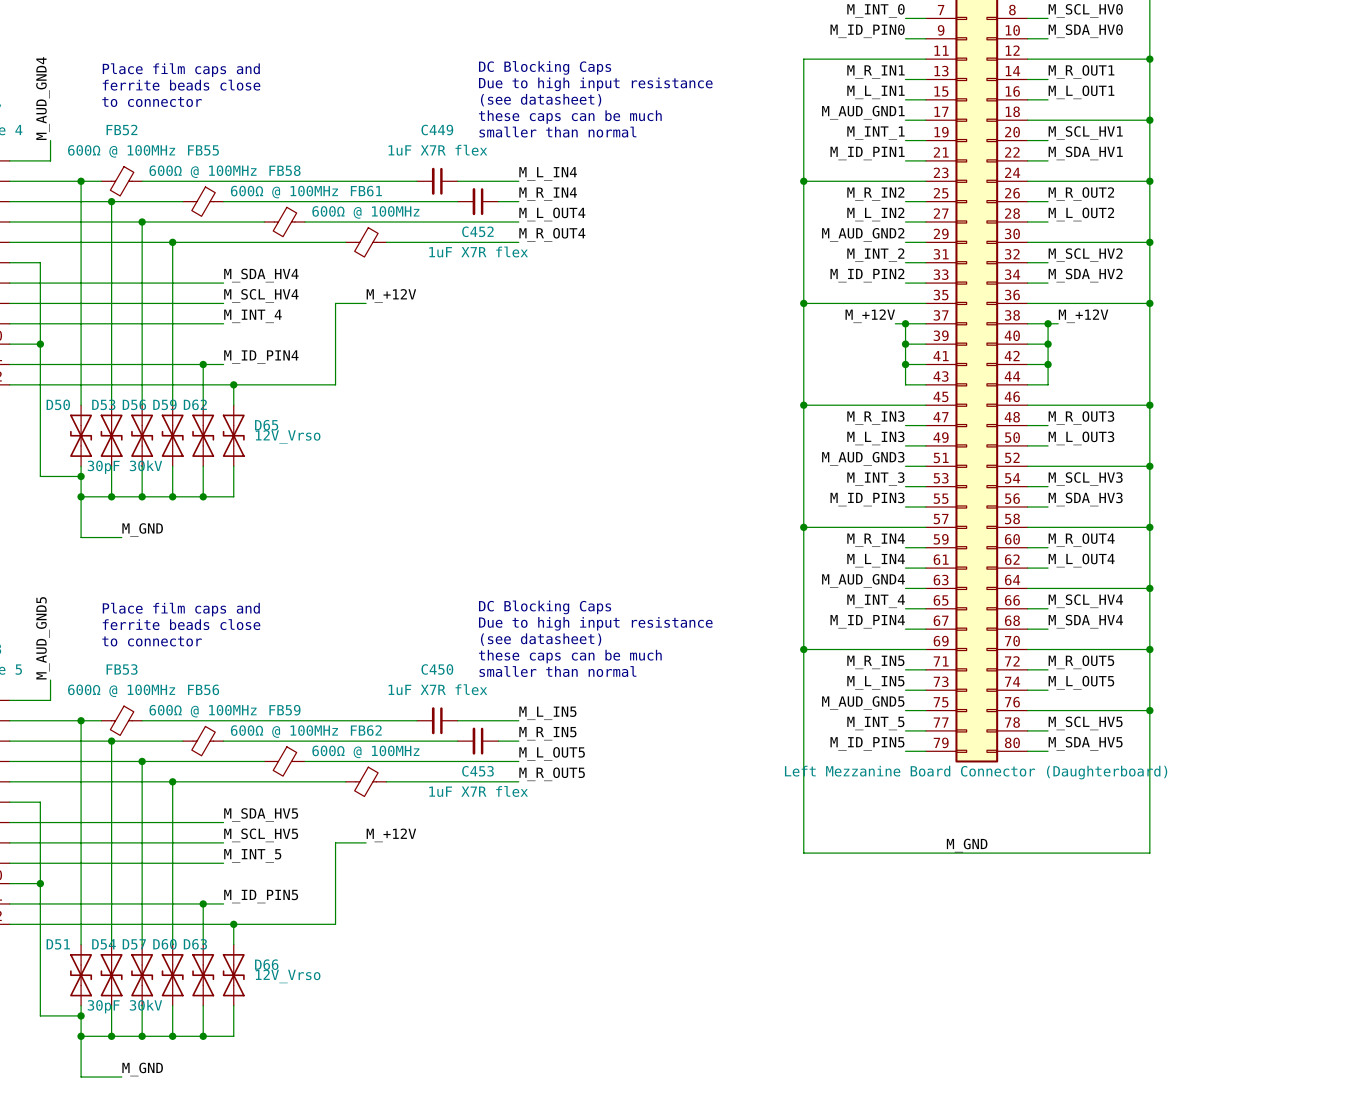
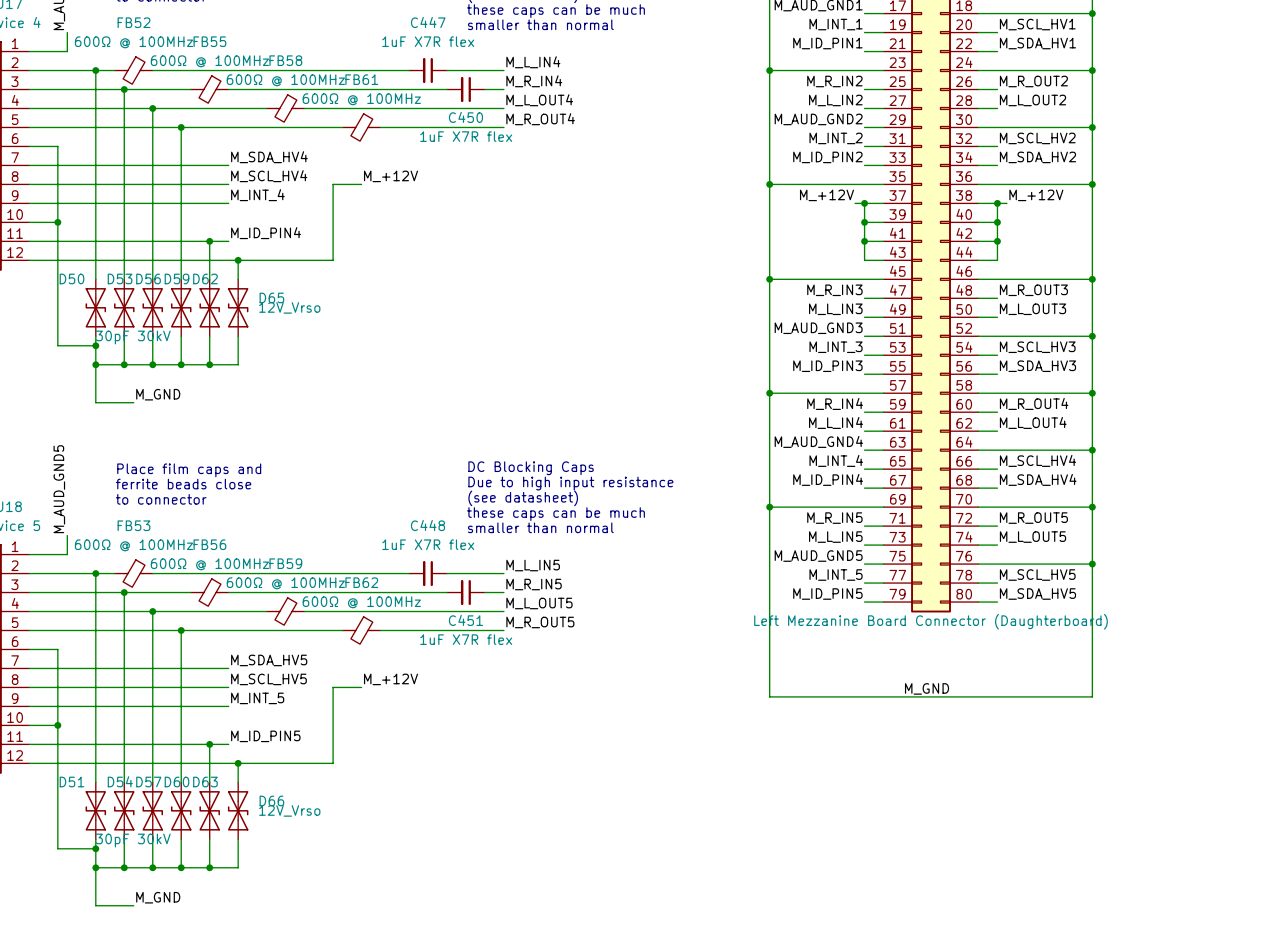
C449 name: C449 (437, 130) -> C447 (428, 22)
C452 name: C452 (477, 231) -> C450 (465, 117)
C450 name: C450 (437, 669) -> C448 (427, 525)
C453 name: C453 (477, 771) -> C451 (465, 620)

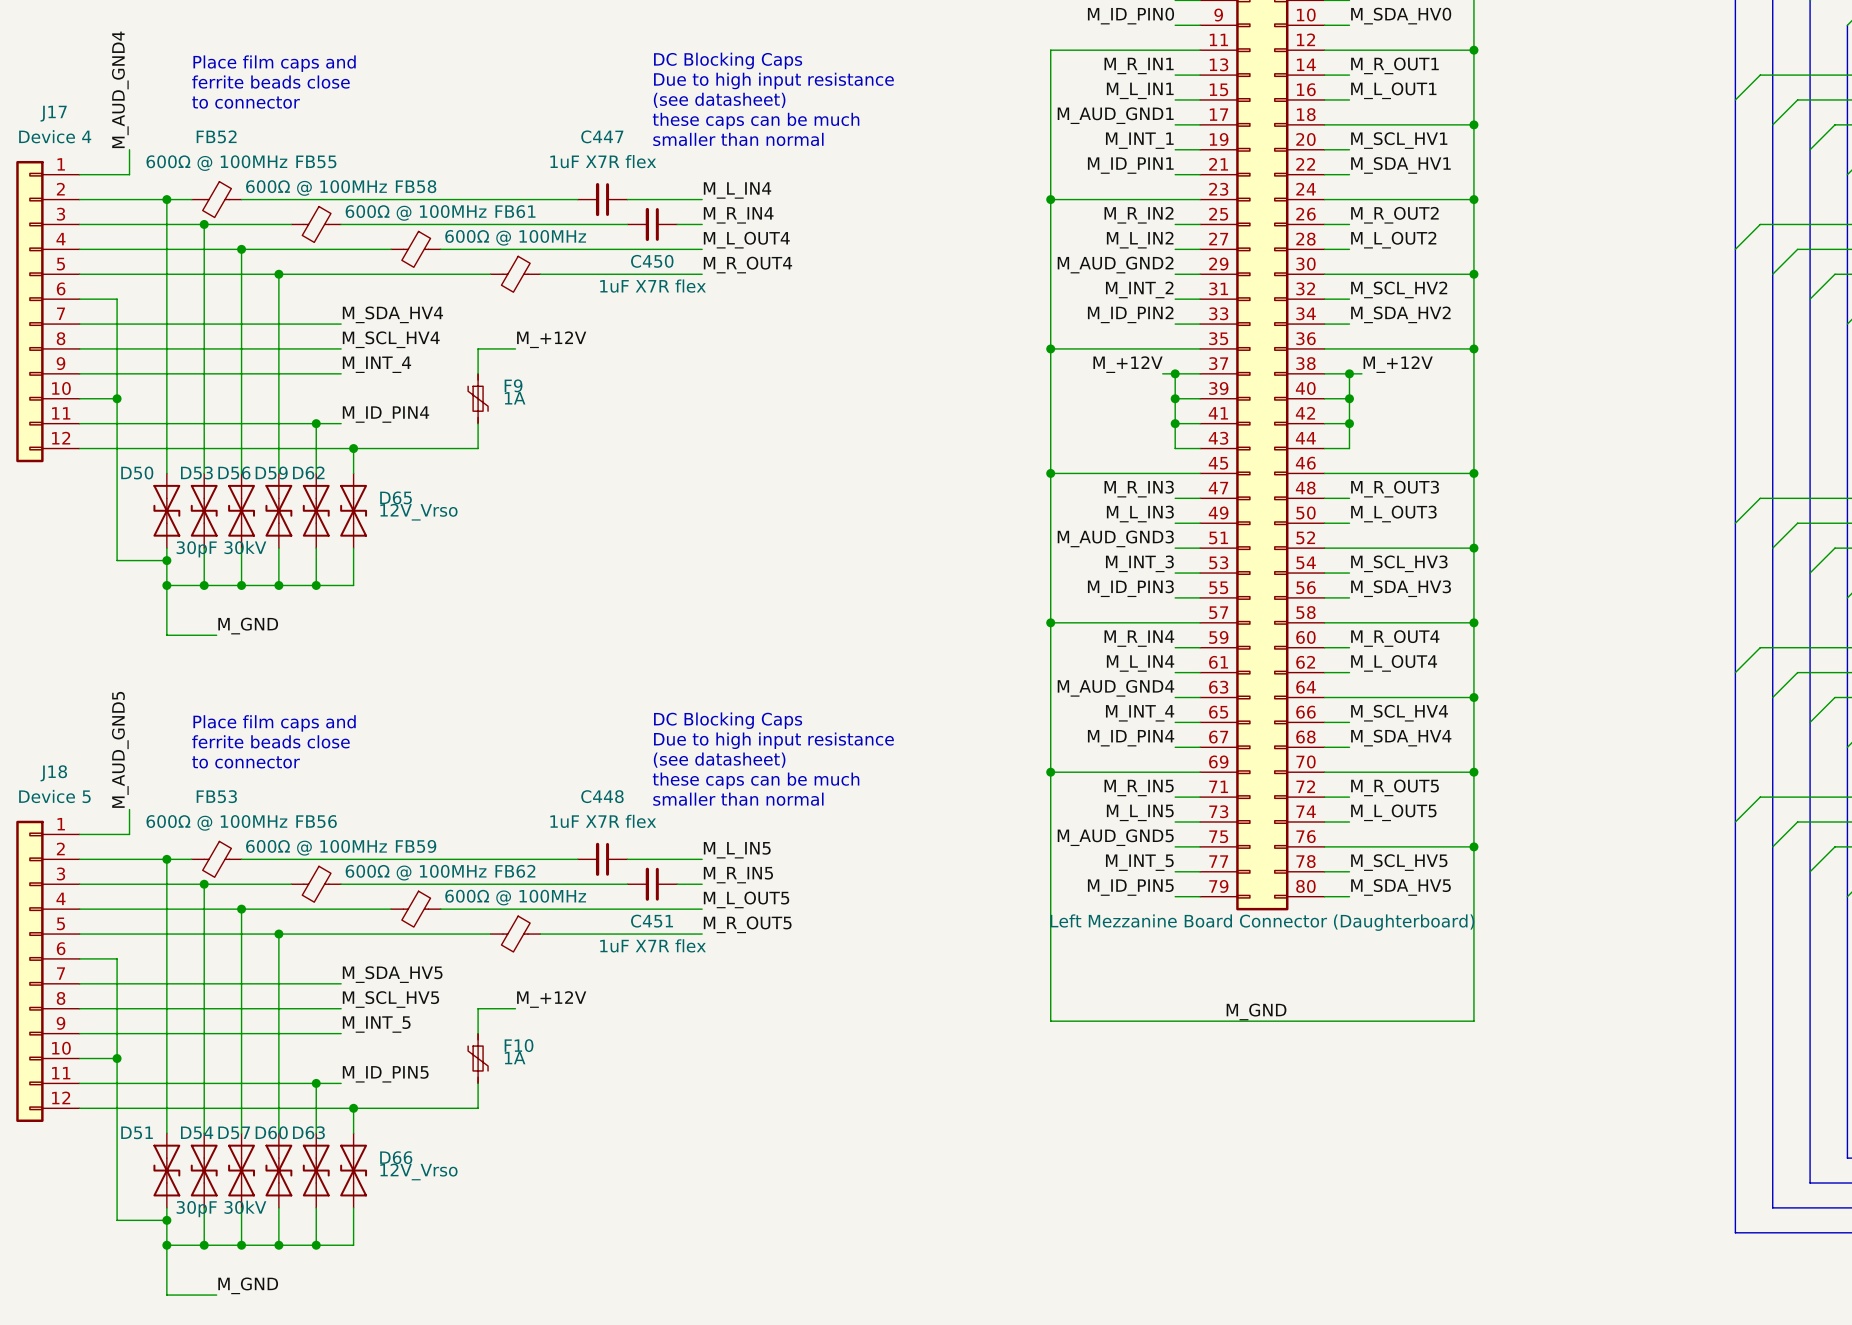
F9: none -> 1A (478, 398)
F10: none -> 1A (478, 1058)

